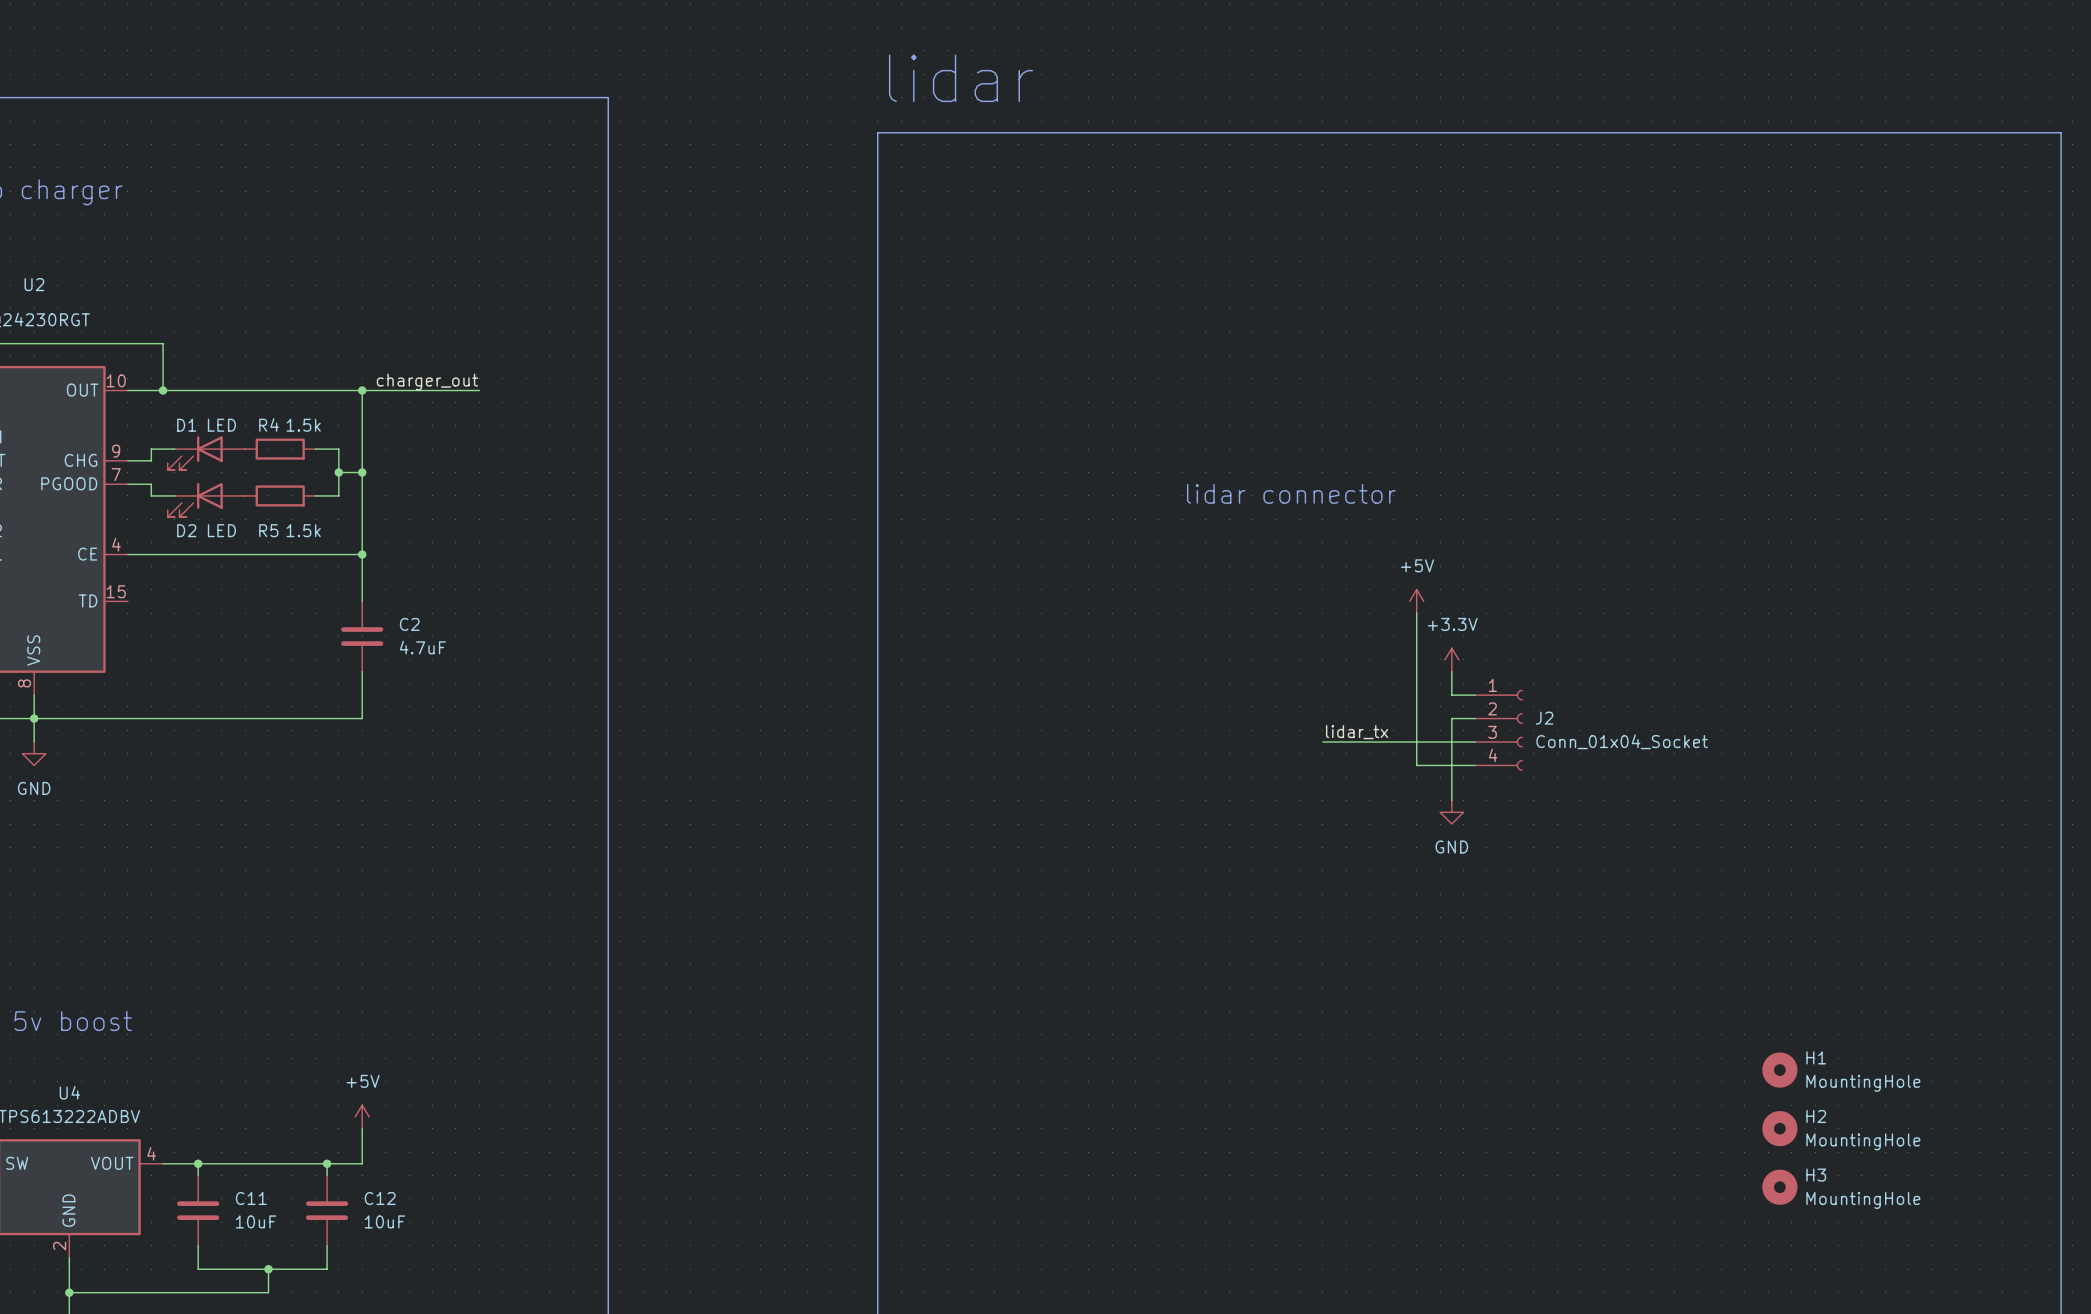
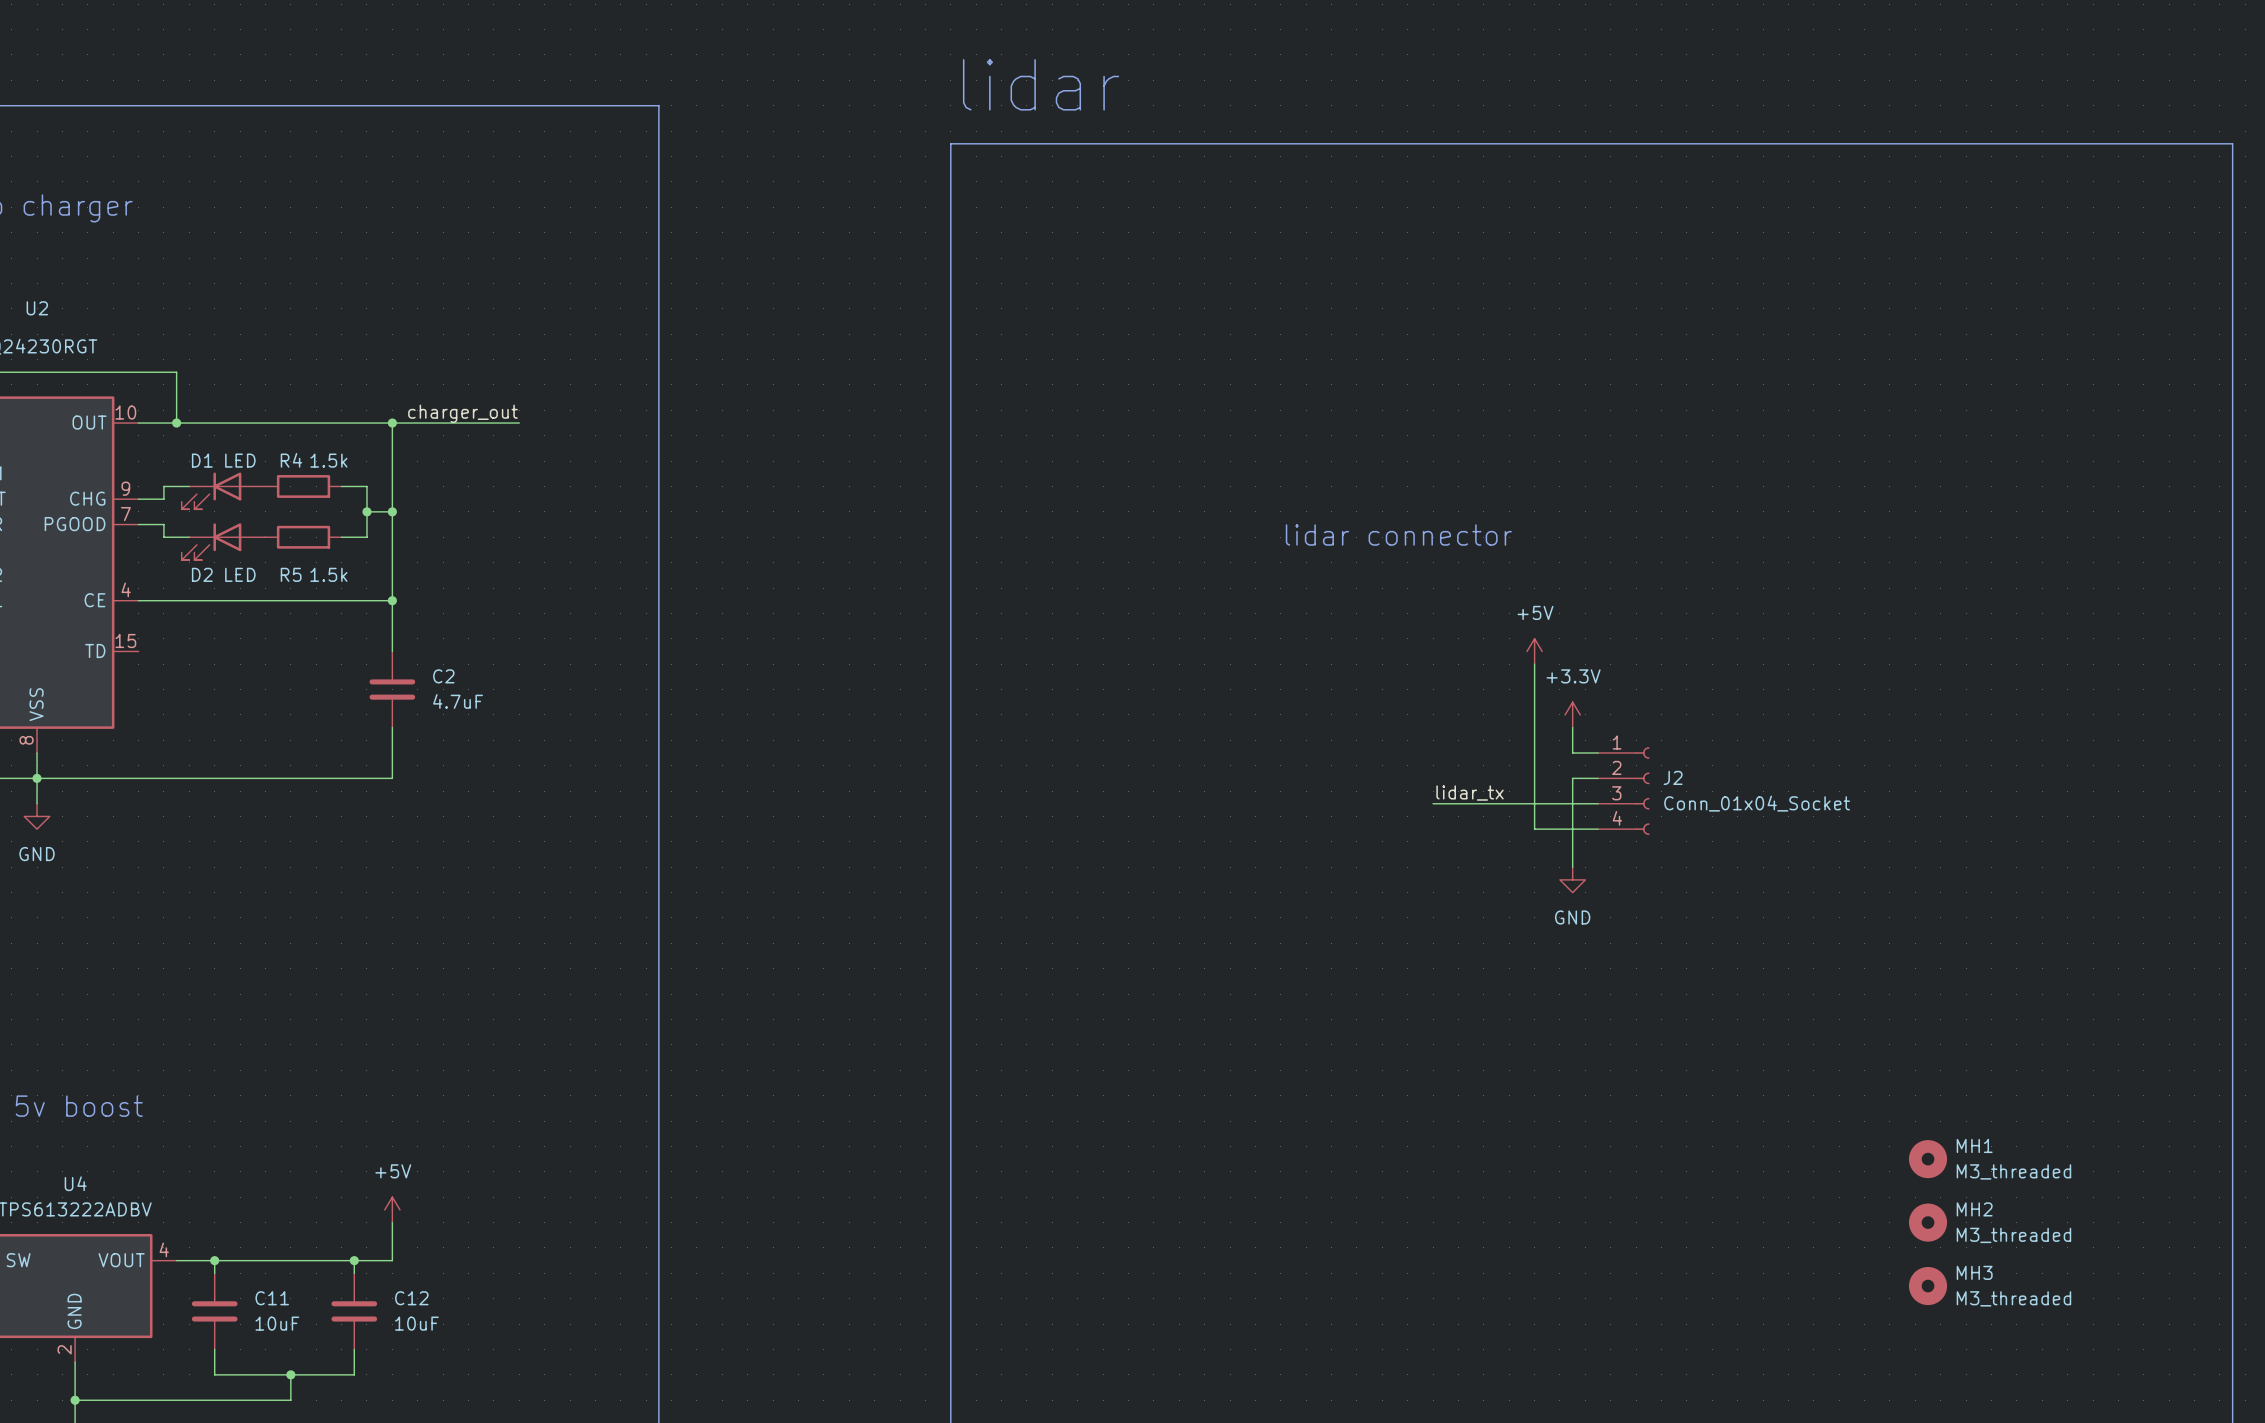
H1 name: H1 (1816, 1057) -> MH1 (1974, 1145)
H1 value: MountingHole (1863, 1083) -> M3_threaded (2013, 1171)
H2 name: H2 (1816, 1116) -> MH2 (1974, 1209)
H2 value: MountingHole (1863, 1141) -> M3_threaded (2013, 1235)
H3 name: H3 (1816, 1175) -> MH3 (1974, 1272)
H3 value: MountingHole (1863, 1200) -> M3_threaded (2013, 1298)

